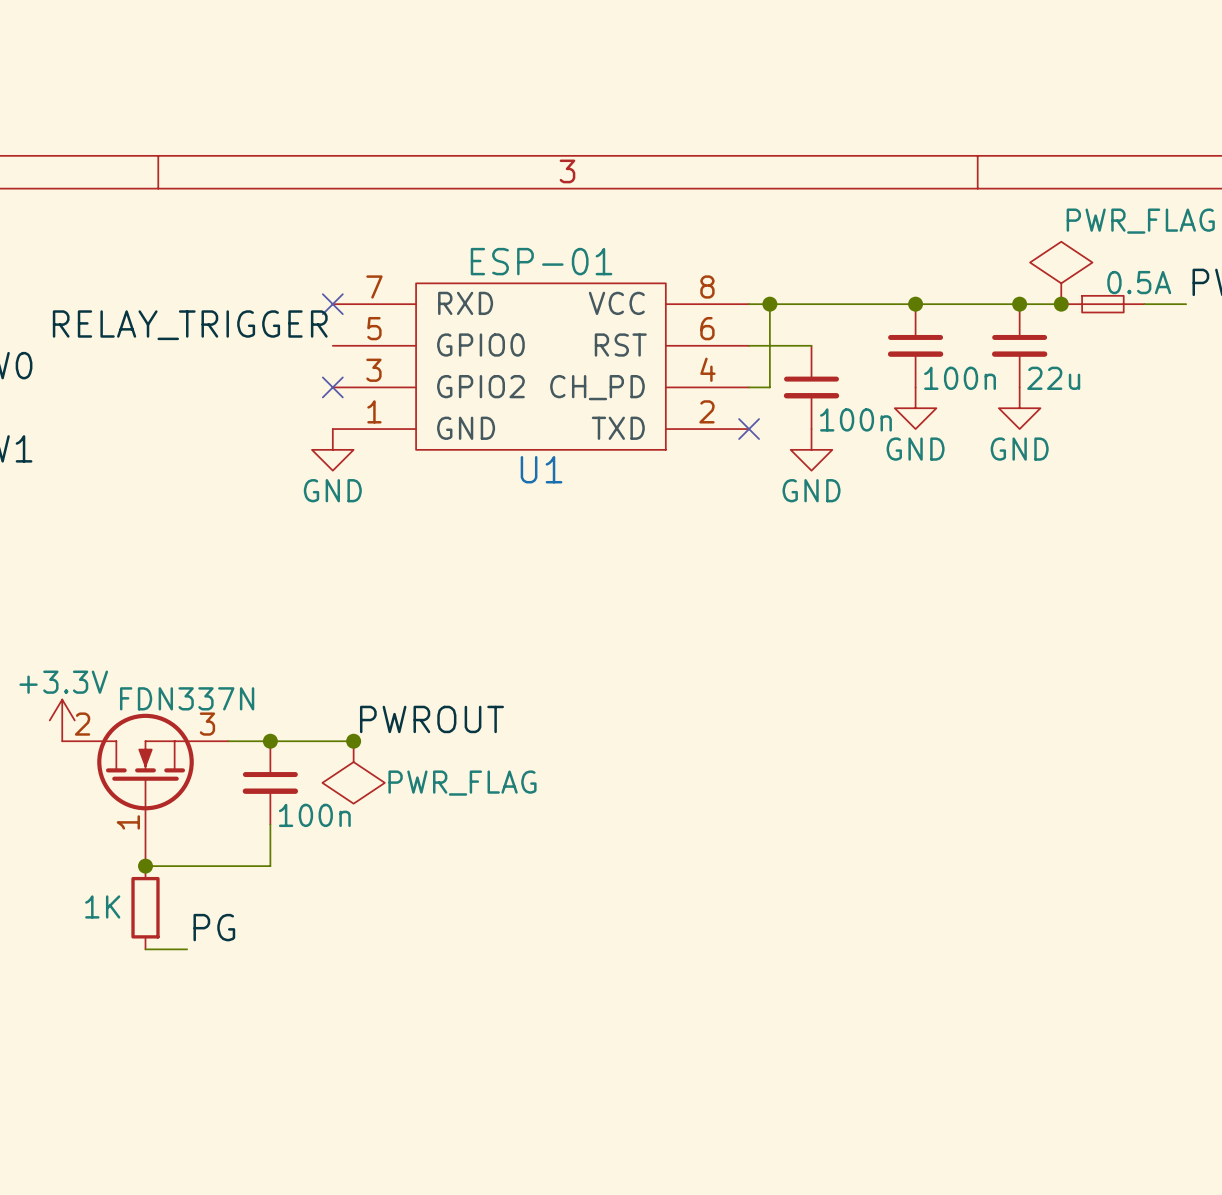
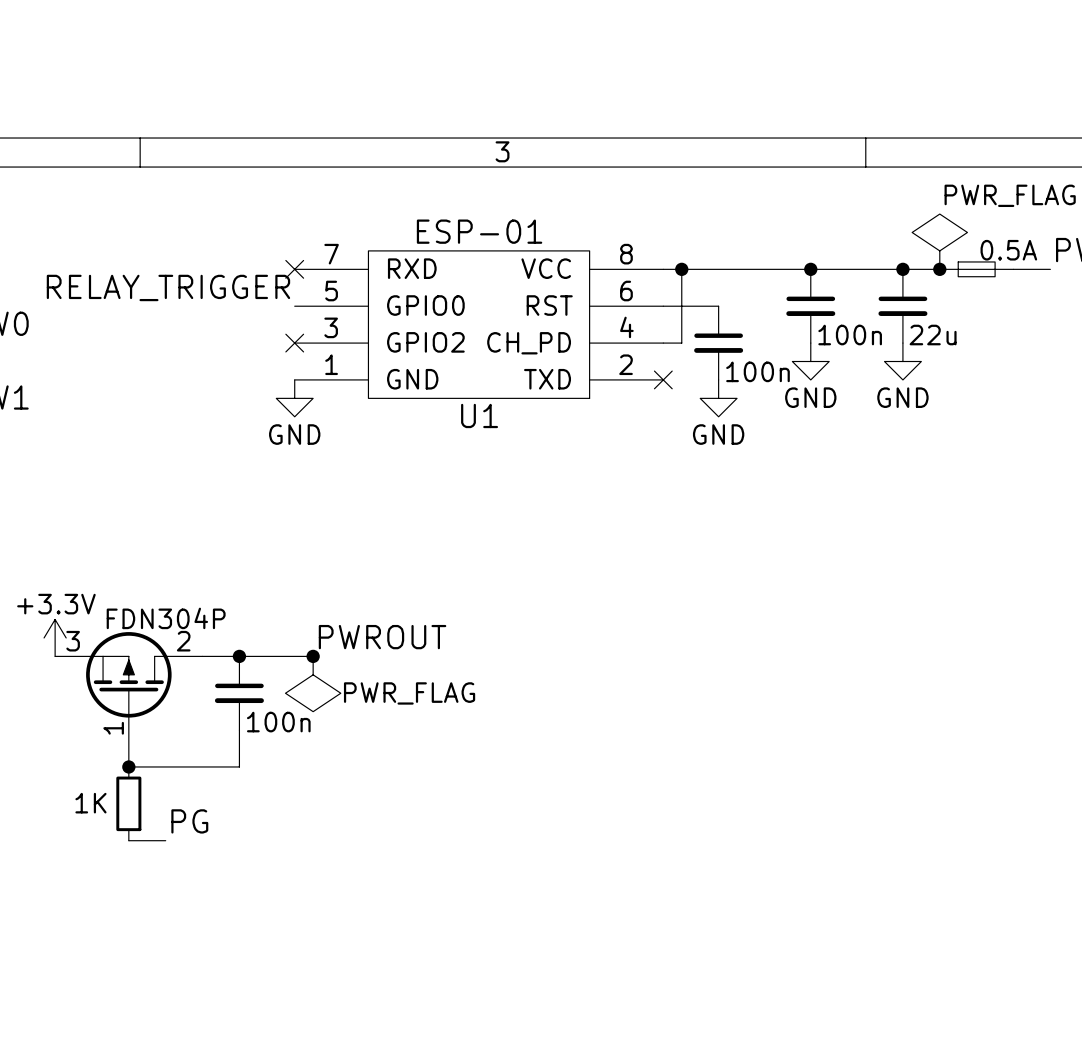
part value: FDN337N (187, 698) -> FDN304P (166, 618)
part symbol: [62, 713, 229, 867] -> [55, 632, 203, 767]

